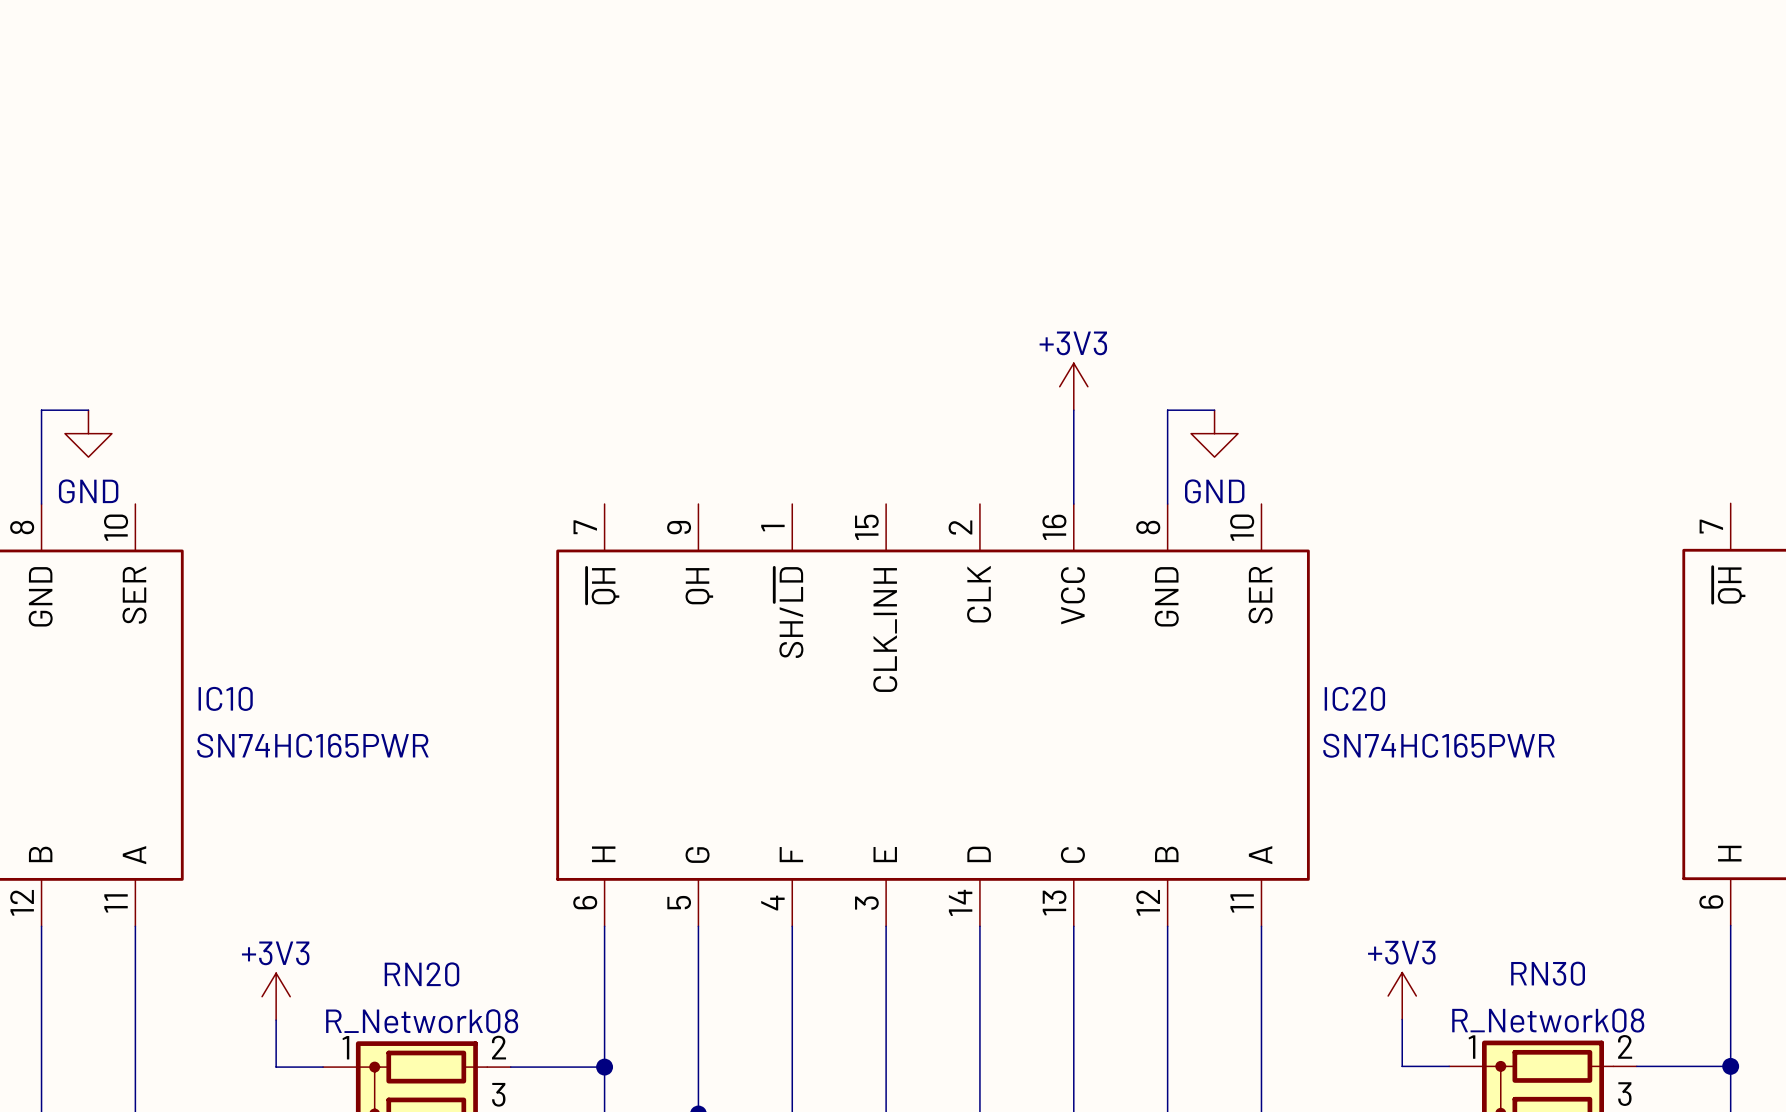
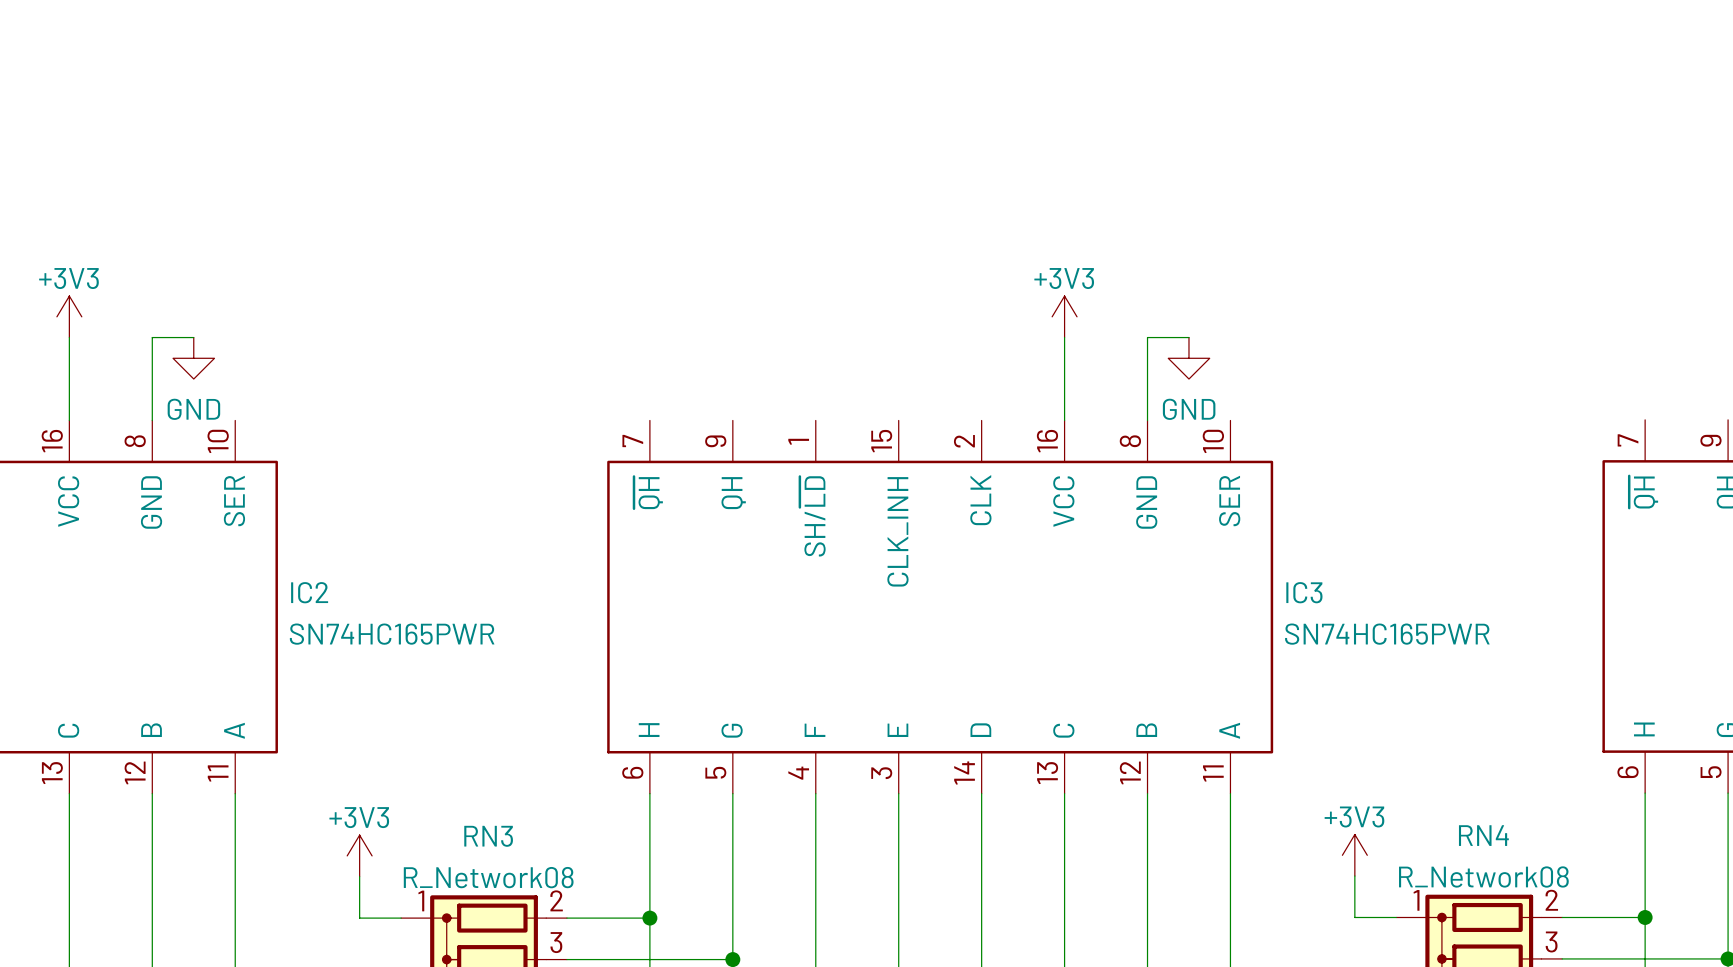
IC10 name: IC10 (225, 698) -> IC2 (309, 592)
IC20 name: IC20 (1354, 698) -> IC3 (1304, 592)
RN30 name: RN30 (1548, 973) -> RN4 (1483, 835)
RN20 name: RN20 (421, 974) -> RN3 (488, 836)

